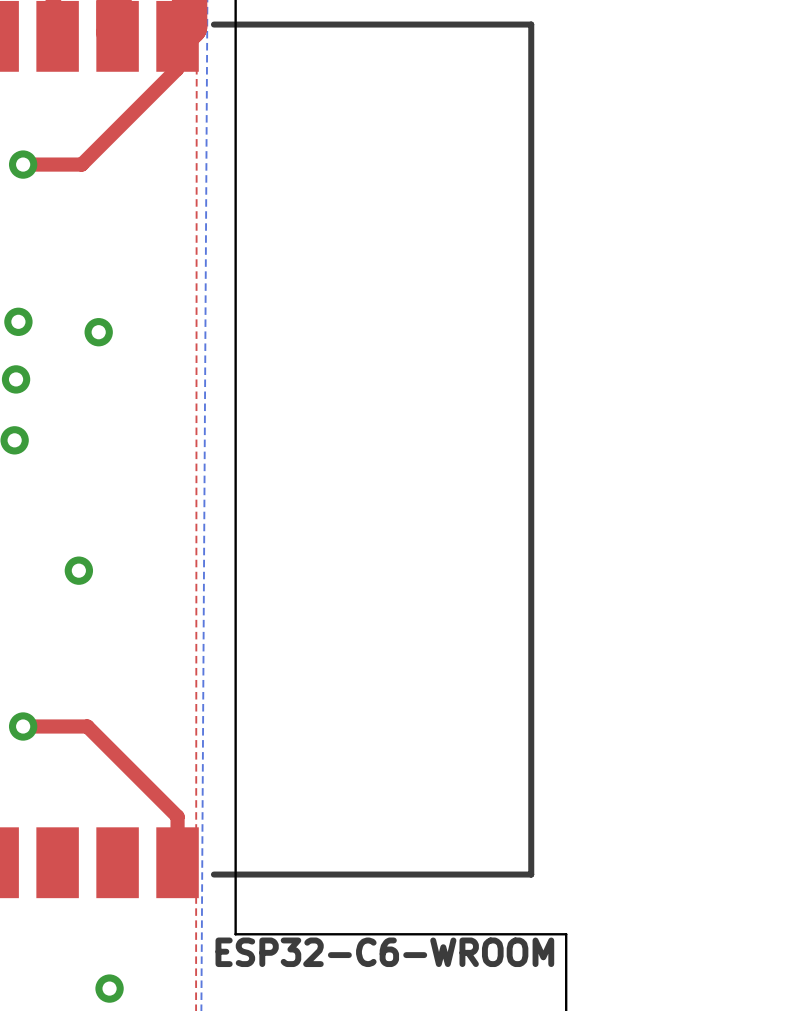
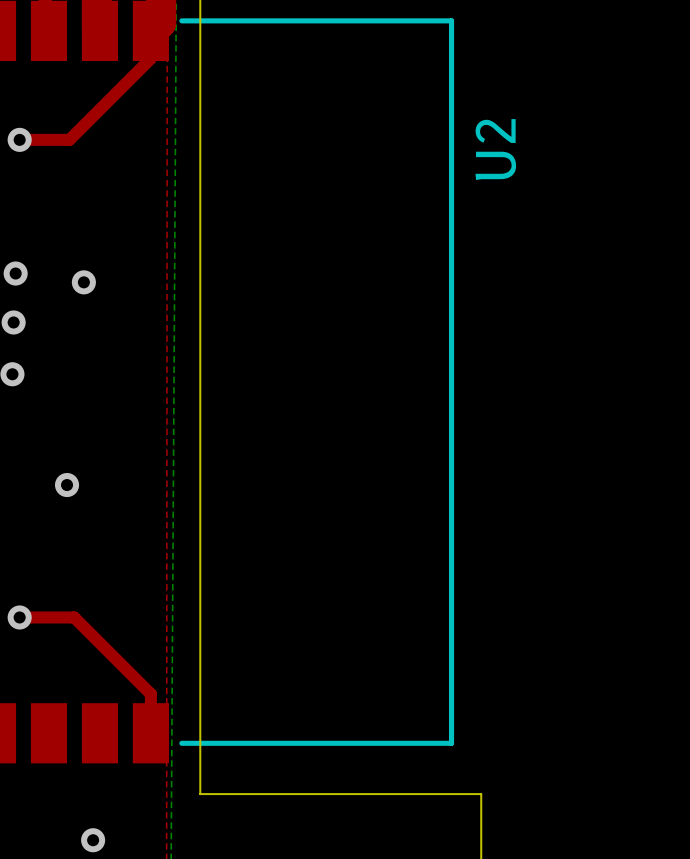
ESP32-C6-WROOM name: ESP32-C6-WROOM (384, 952) -> U2 (495, 149)

